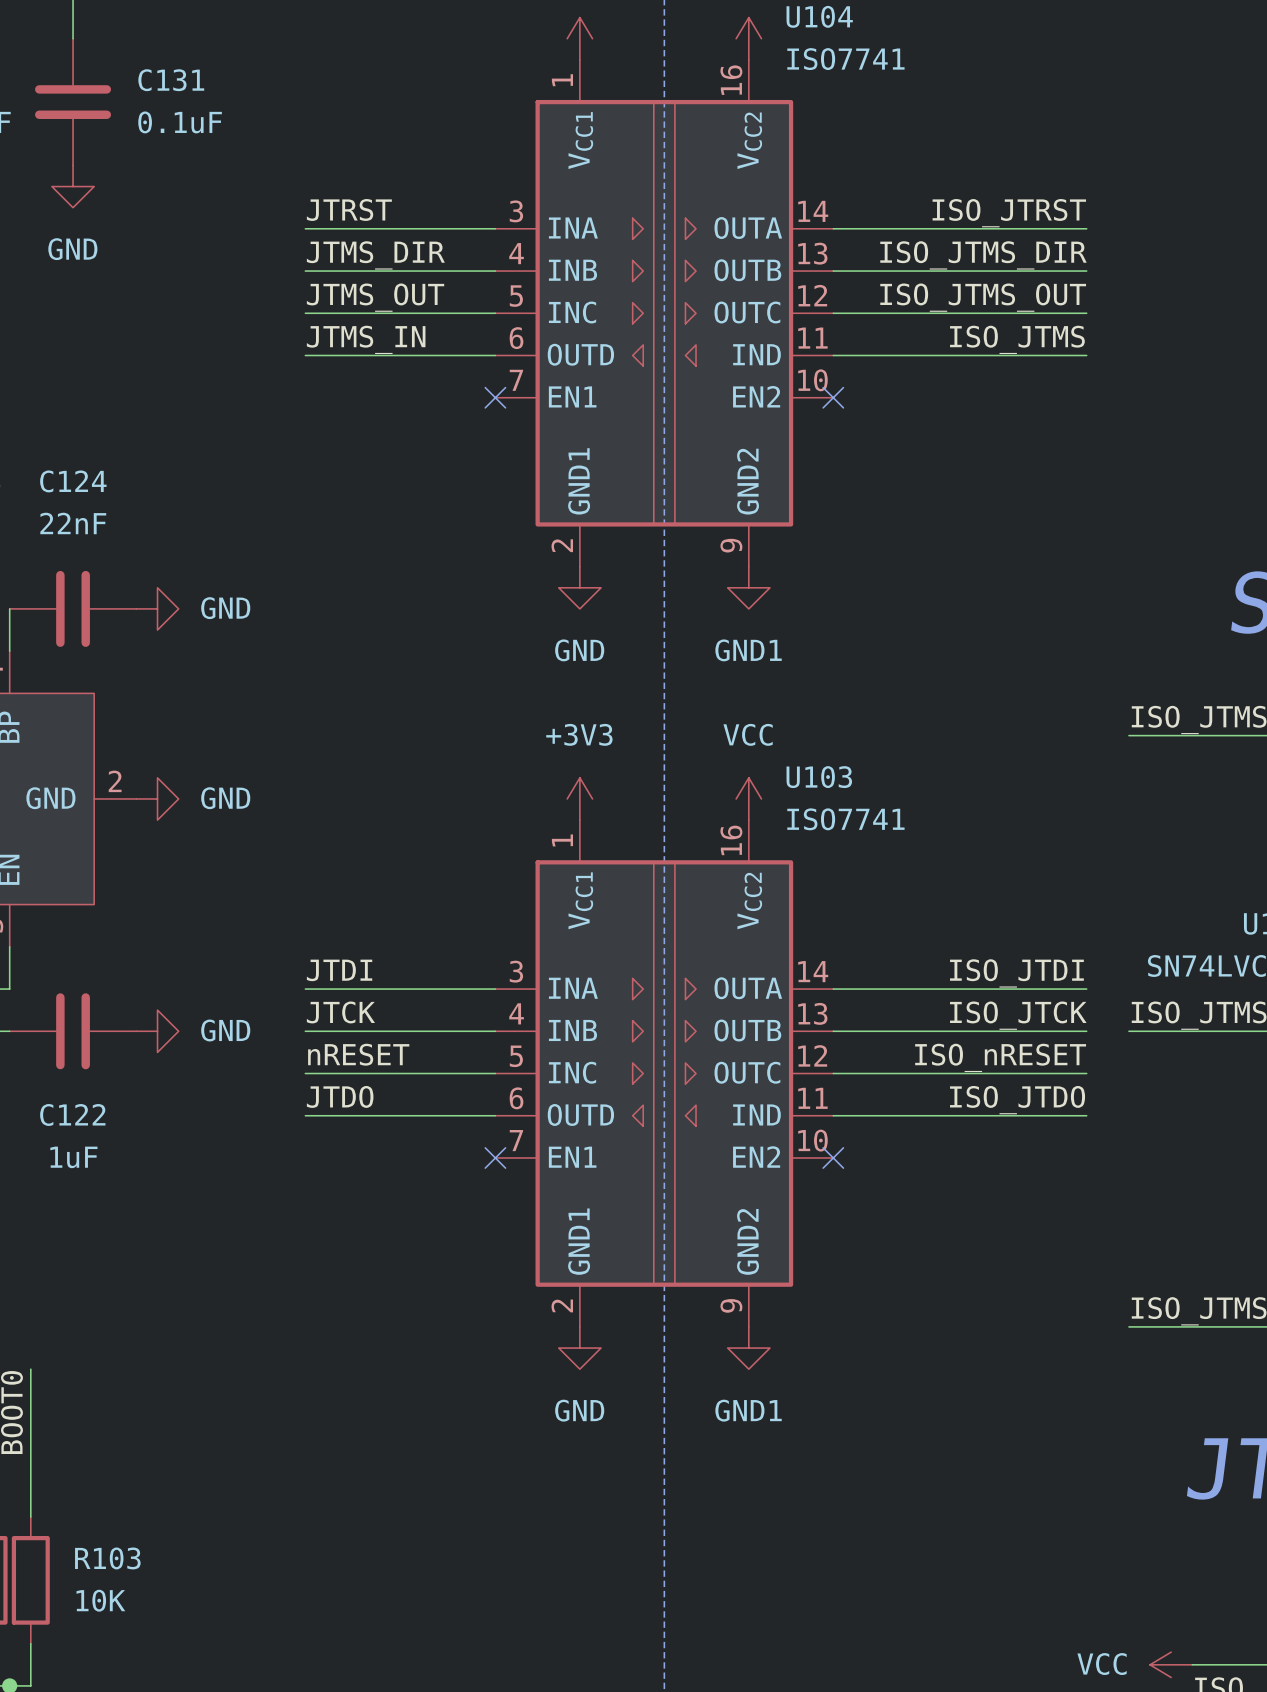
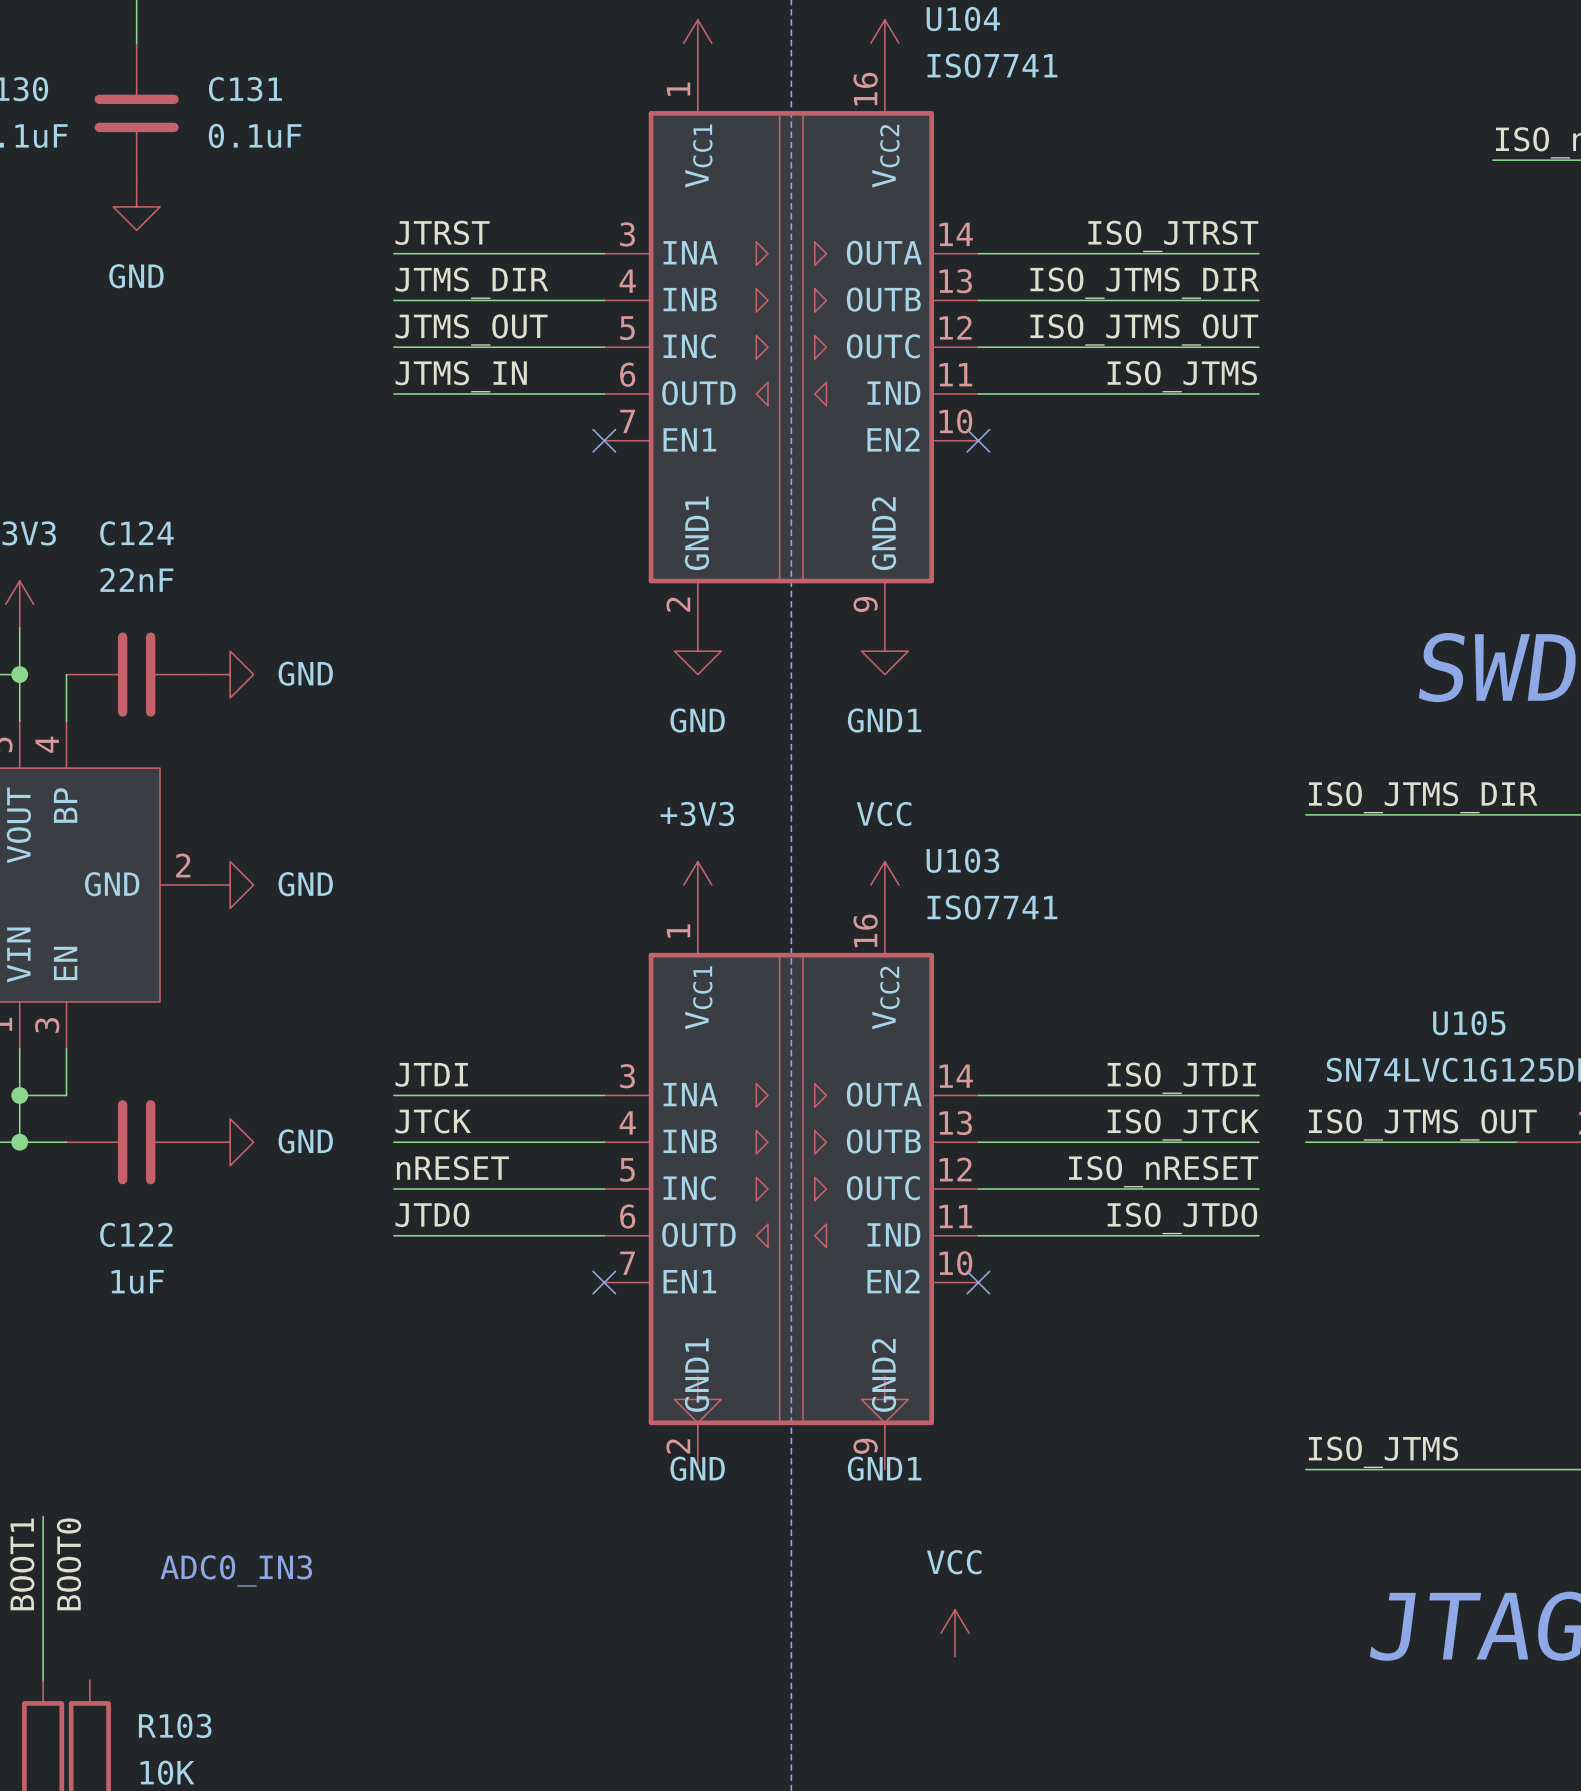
power symbol position: GND (579, 1348) -> GND (697, 1399)
power symbol position: GND1 (748, 1348) -> GND1 (884, 1399)
wire: (30, 1369) (30, 1516) -> none
text: none -> ADC0_IN3 (236, 1570)
power symbol: none -> VCC (955, 1633)

